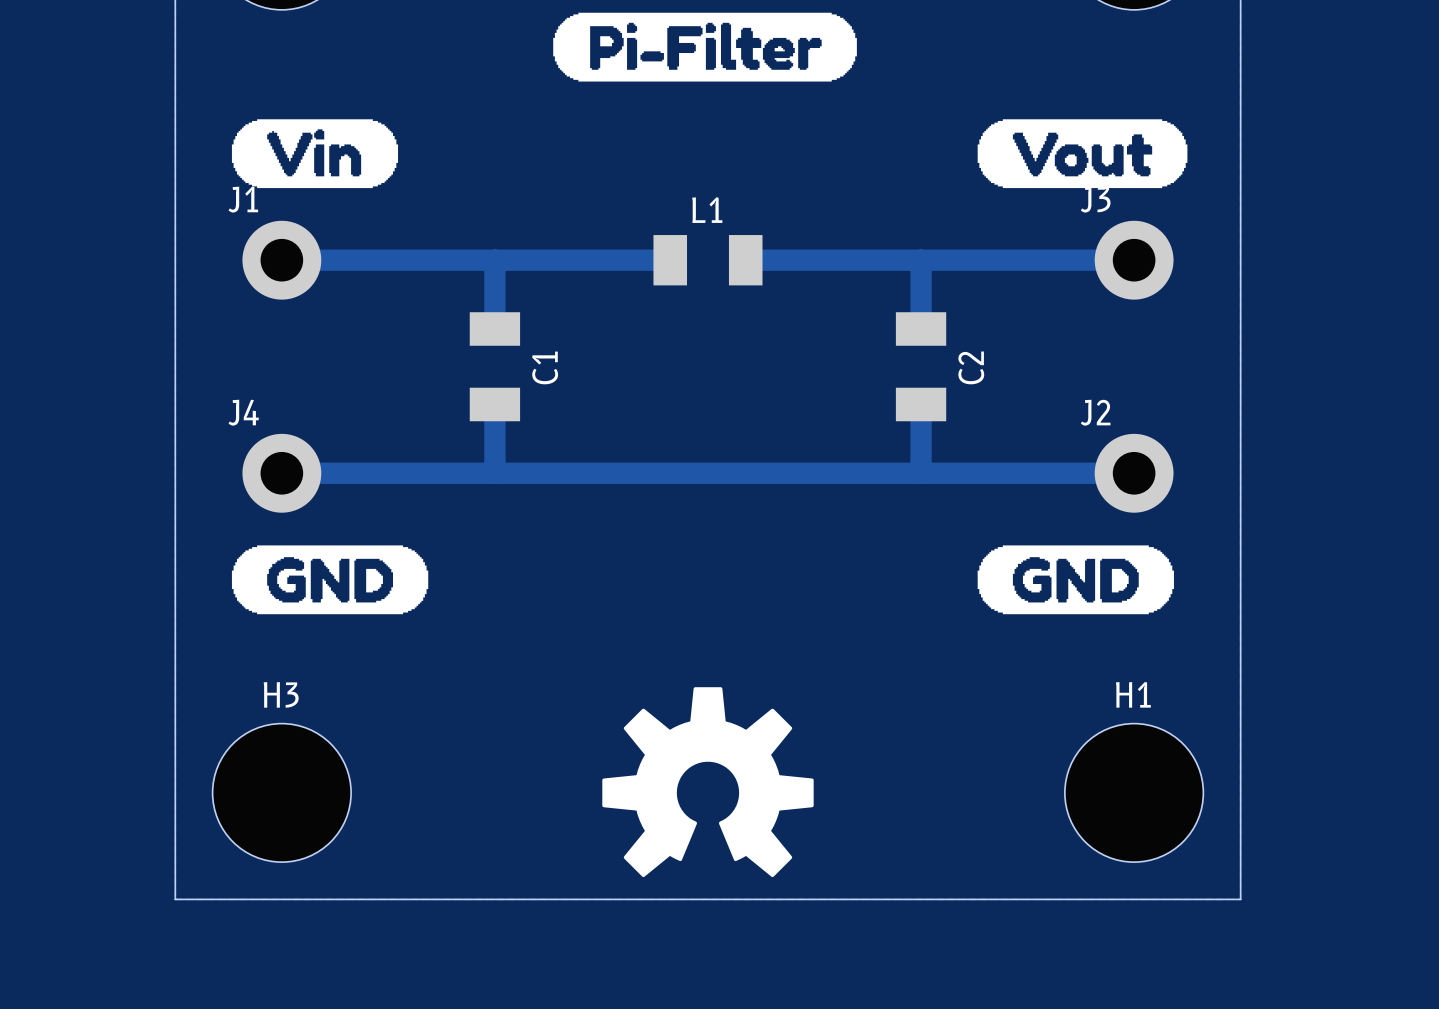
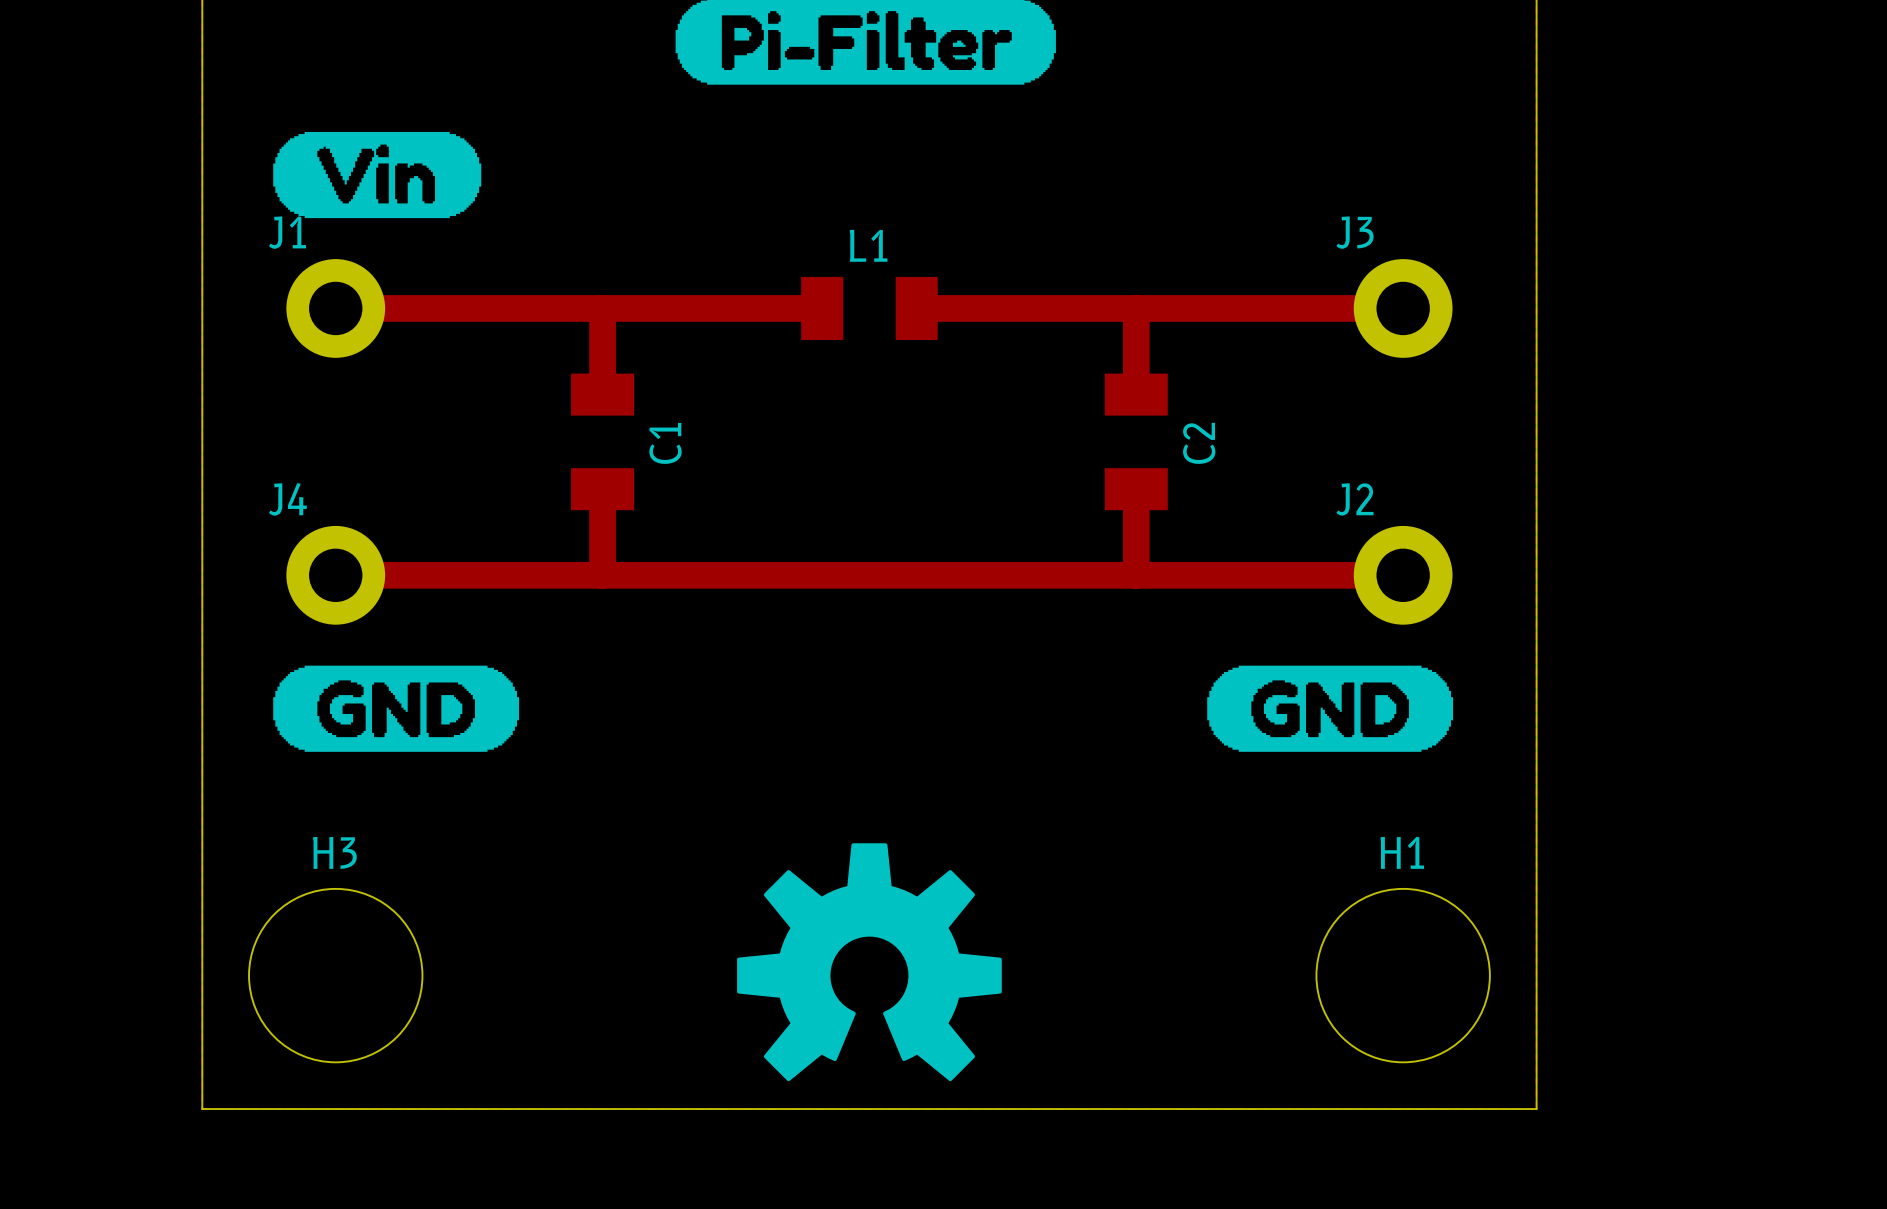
drawing: [977, 119, 1188, 189] -> none

